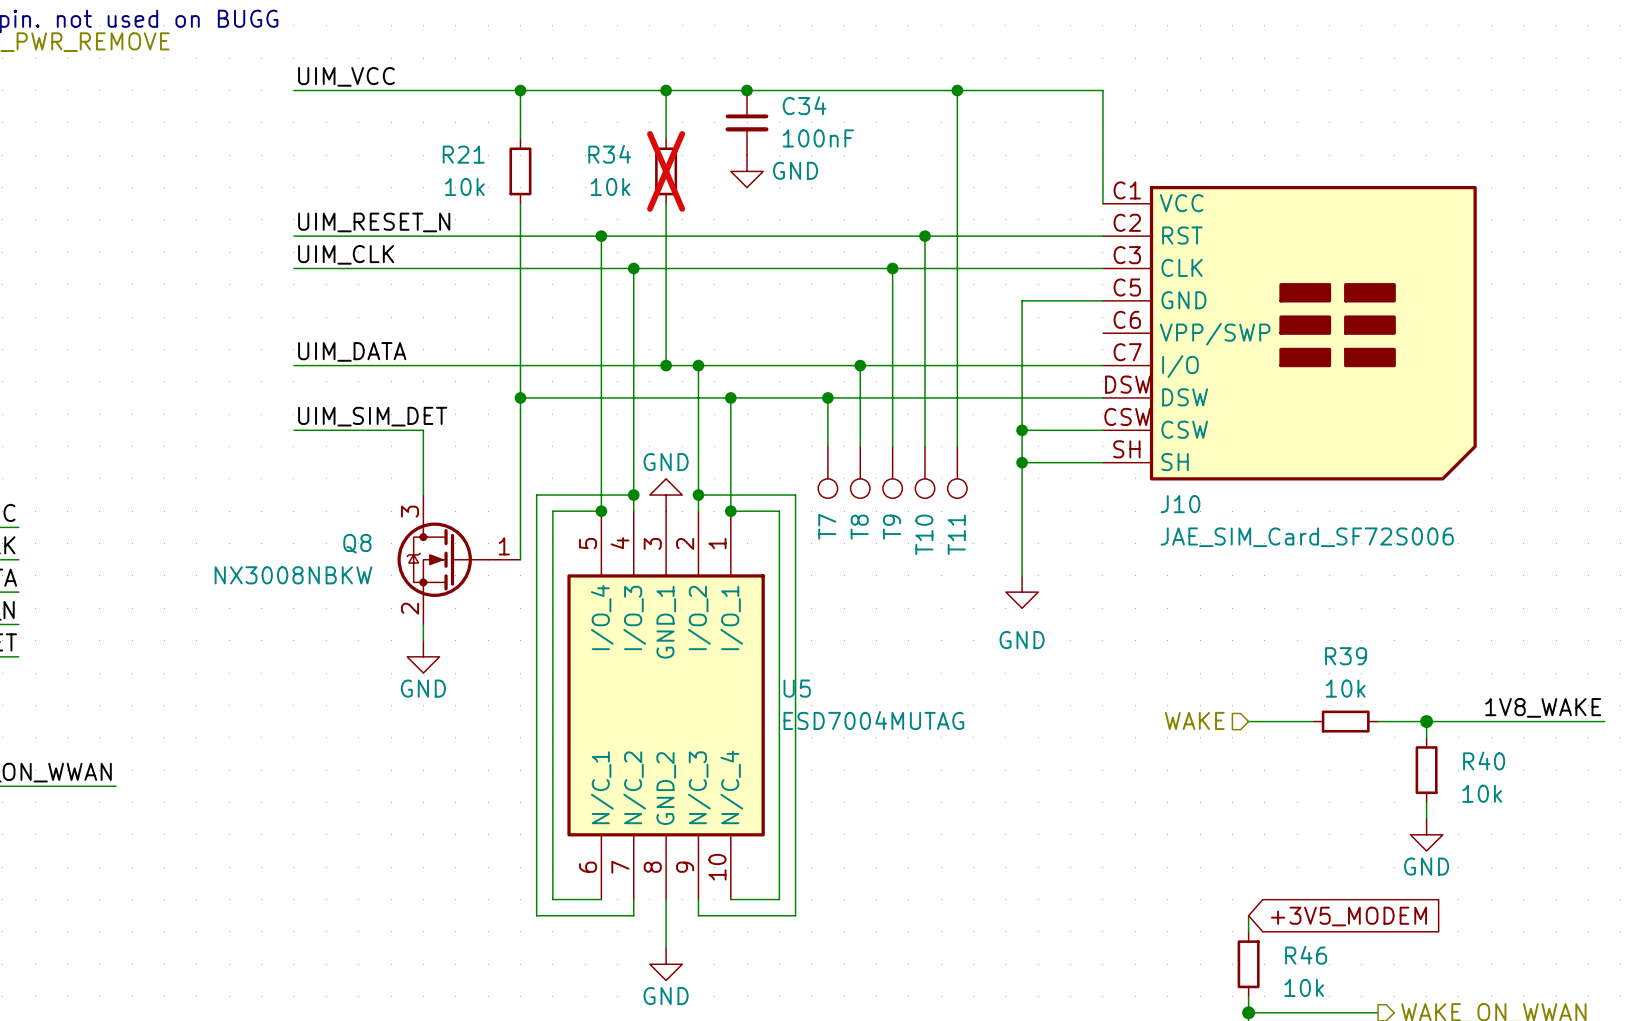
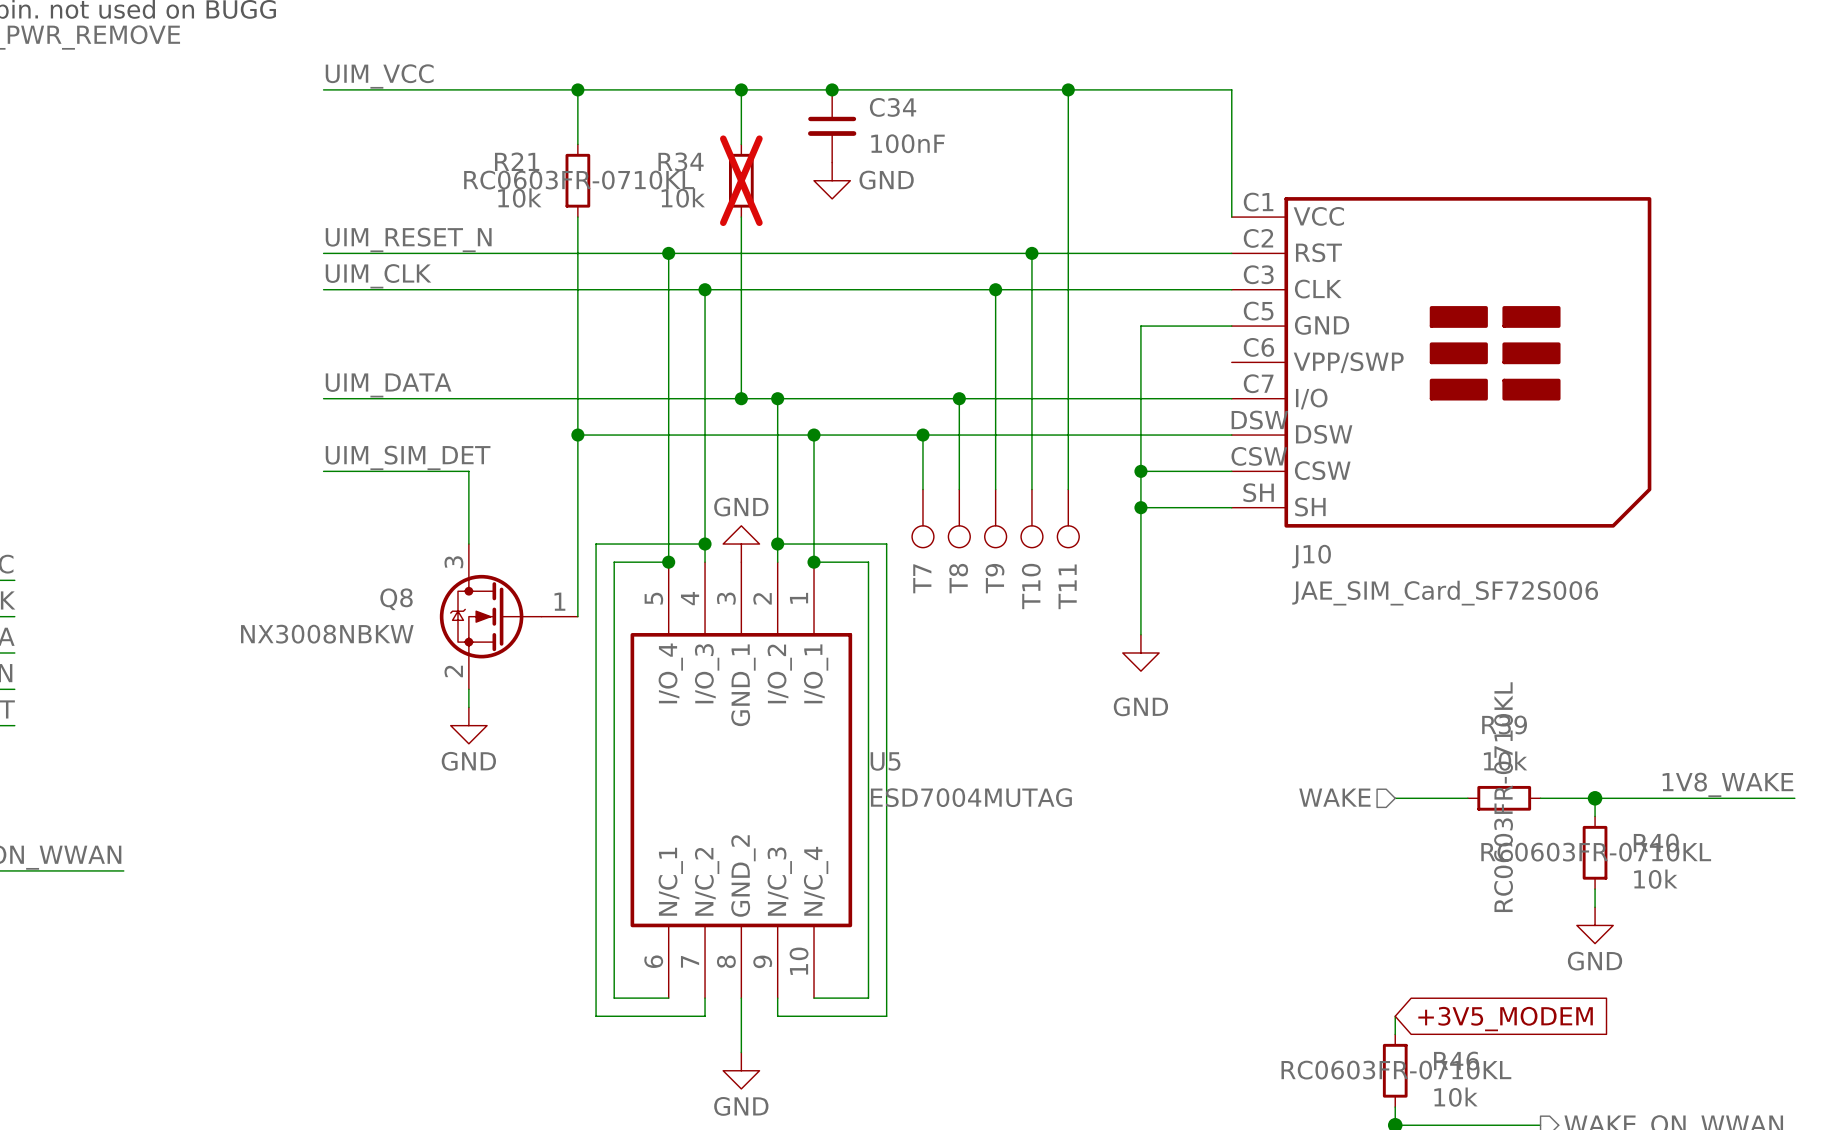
R21 text: none -> RC0603FR-0710KL (579, 180)
R39 text: none -> RC0603FR-0710KL (1503, 797)
R40 text: none -> RC0603FR-0710KL (1596, 852)
R46 text: none -> RC0603FR-0710KL (1396, 1070)

